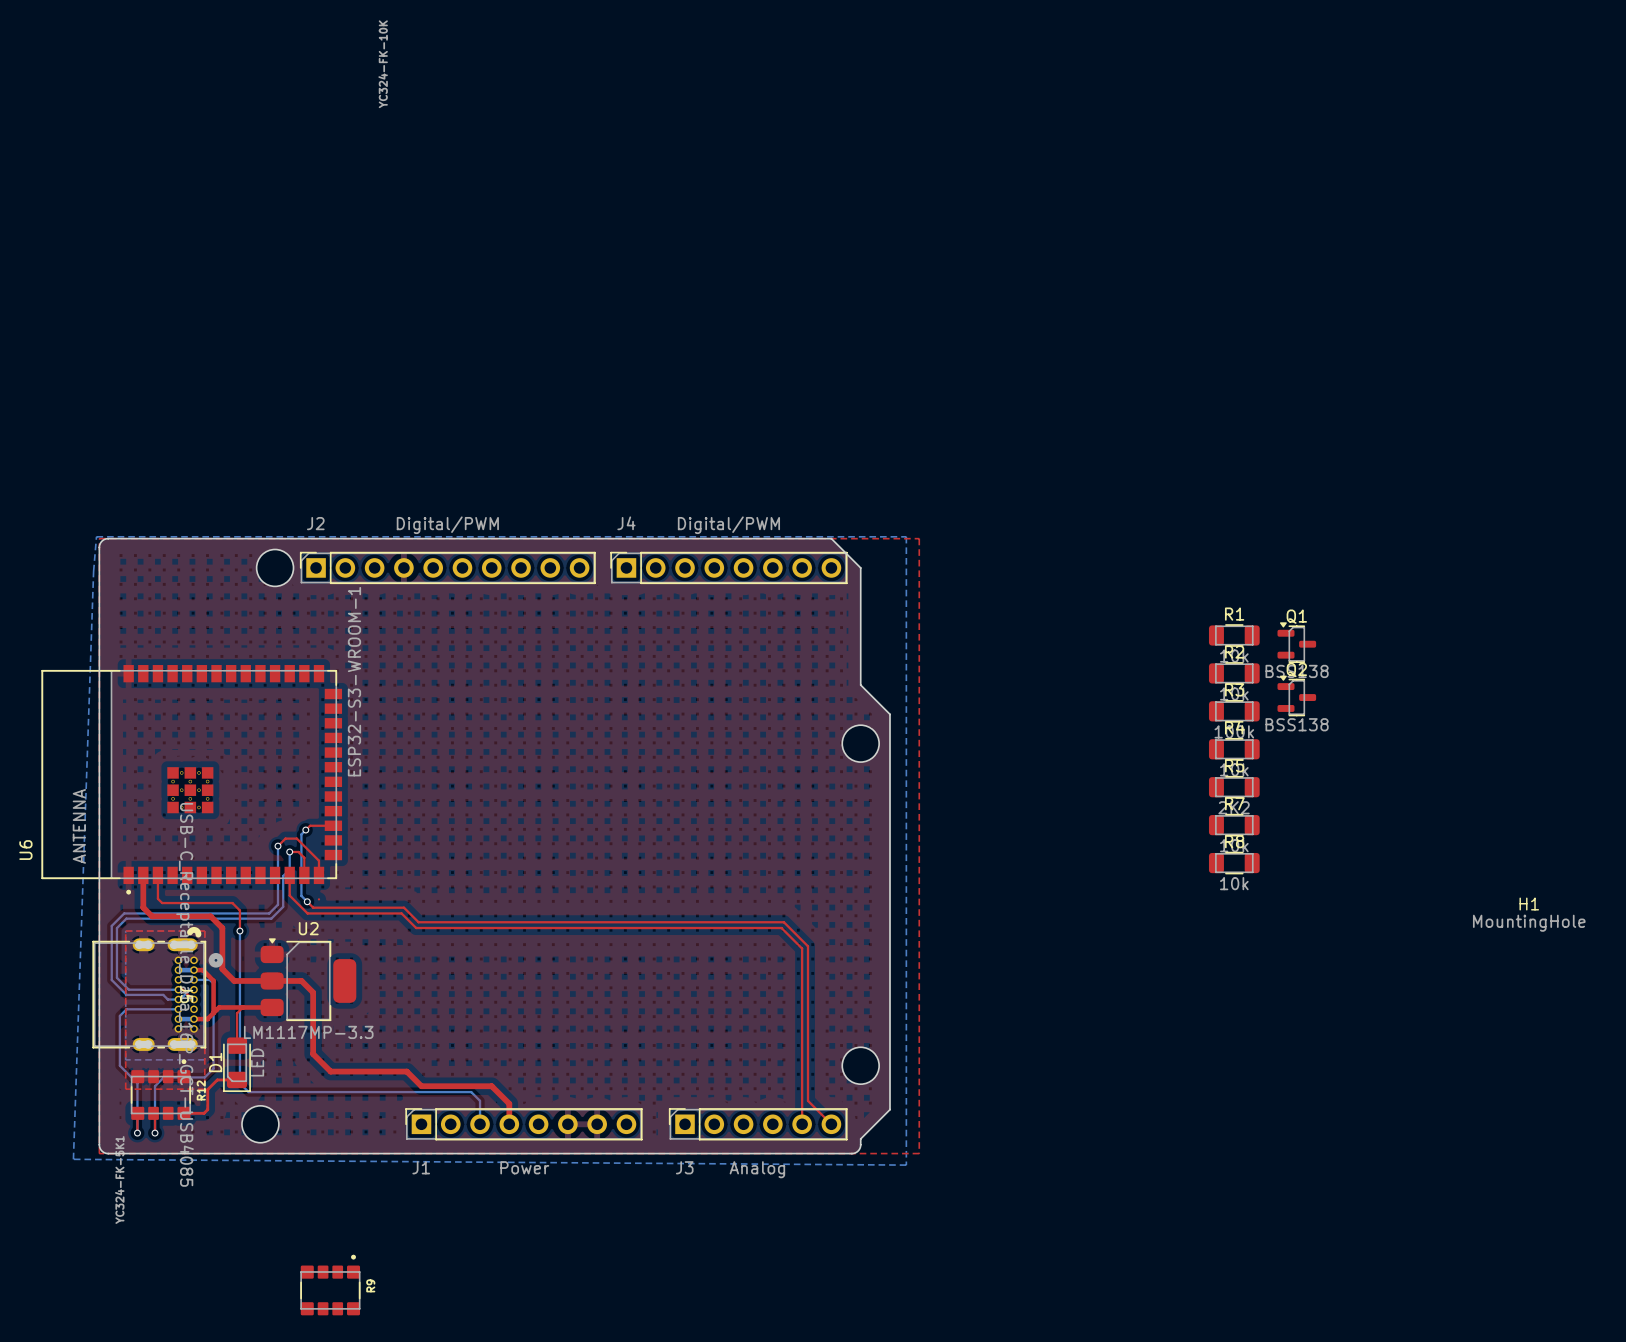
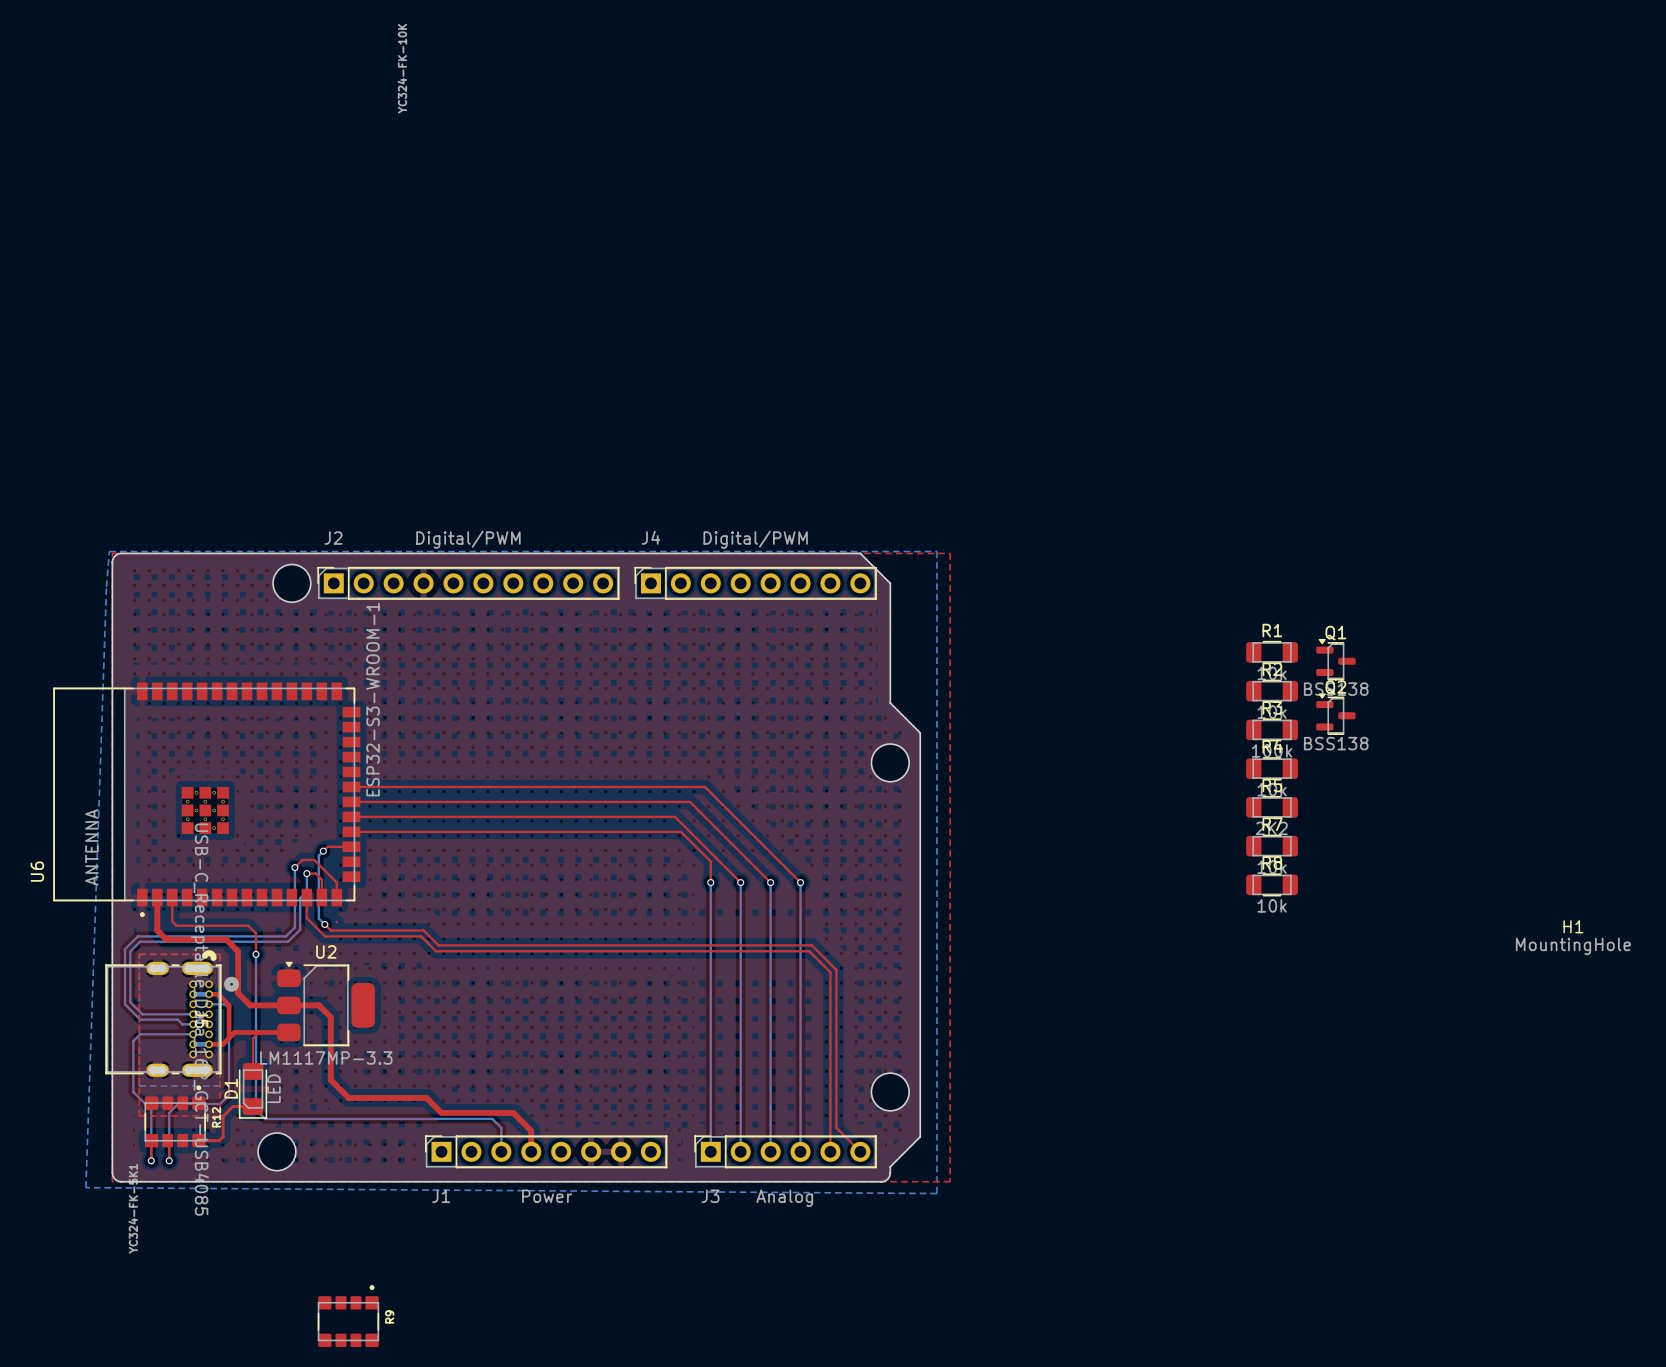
top track: none -> (351, 786) (704, 786) (800, 882)
top track: none -> (351, 801) (689, 801) (770, 882)
top track: none -> (351, 816) (675, 816) (740, 882)
top track: none -> (351, 831) (681, 831) (710, 861) (710, 882)
bottom track: none -> (710, 882) (710, 1151)
via: none -> (710, 882)
bottom track: none -> (740, 882) (740, 1151)
via: none -> (740, 882)
bottom track: none -> (770, 882) (770, 1151)
via: none -> (770, 882)
bottom track: none -> (800, 882) (800, 1151)
via: none -> (800, 882)

